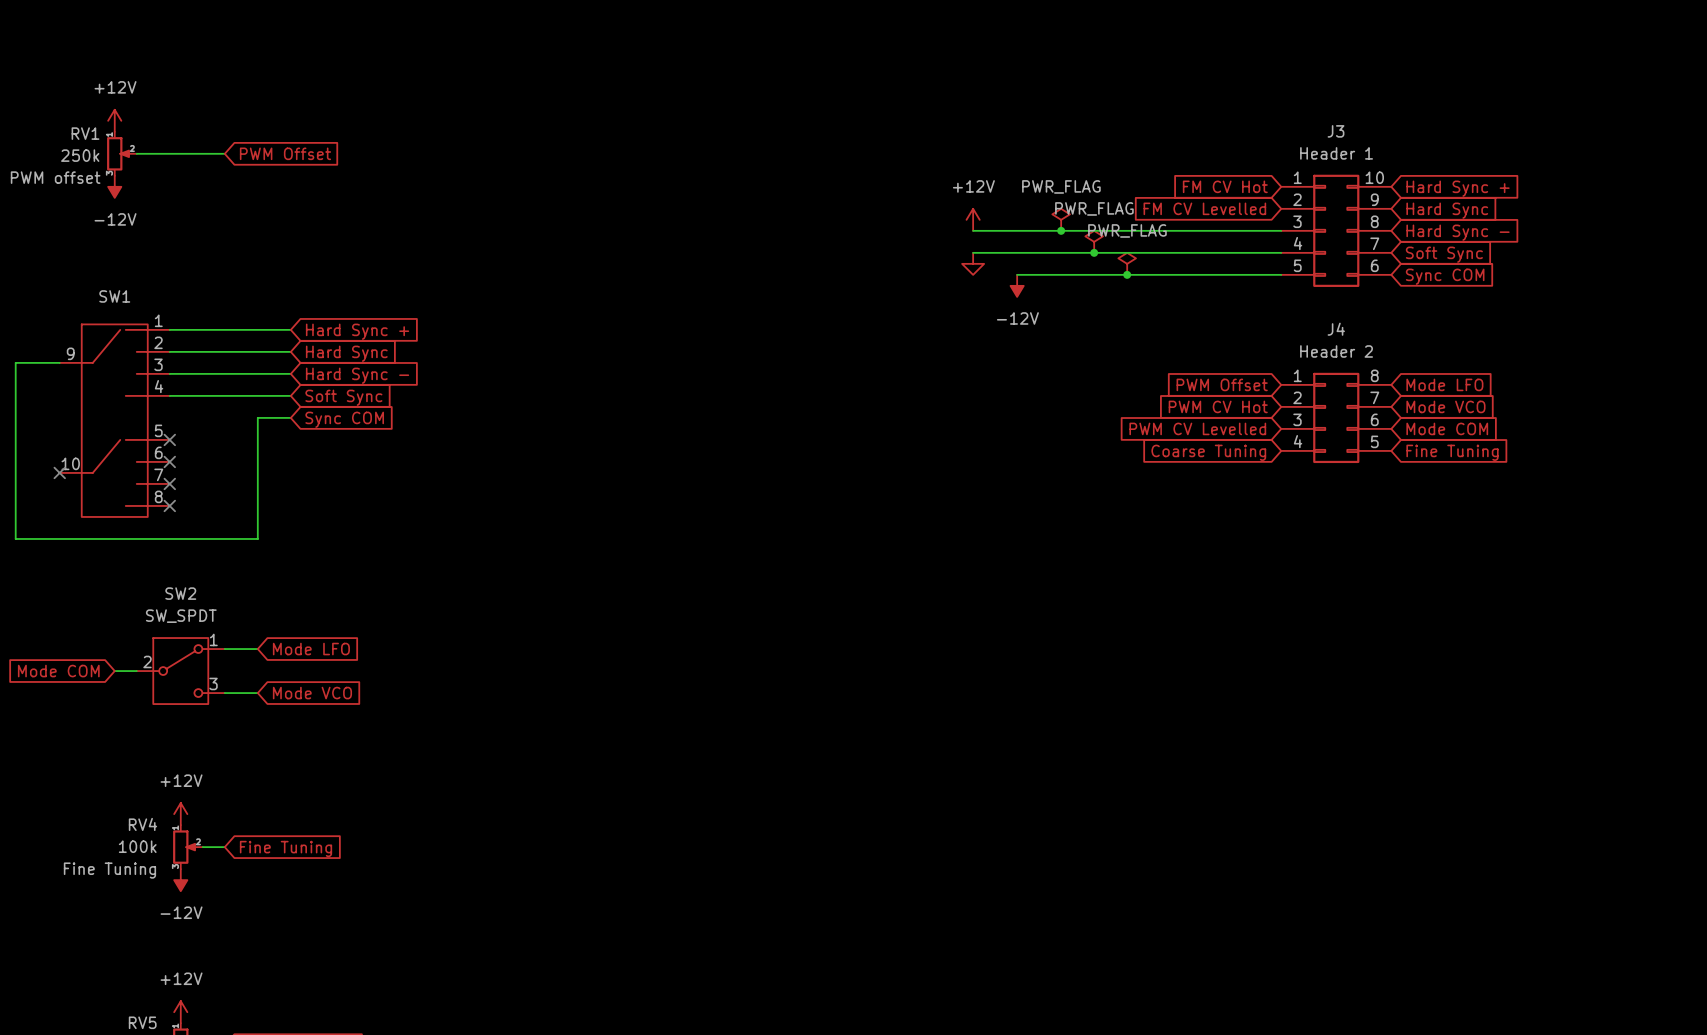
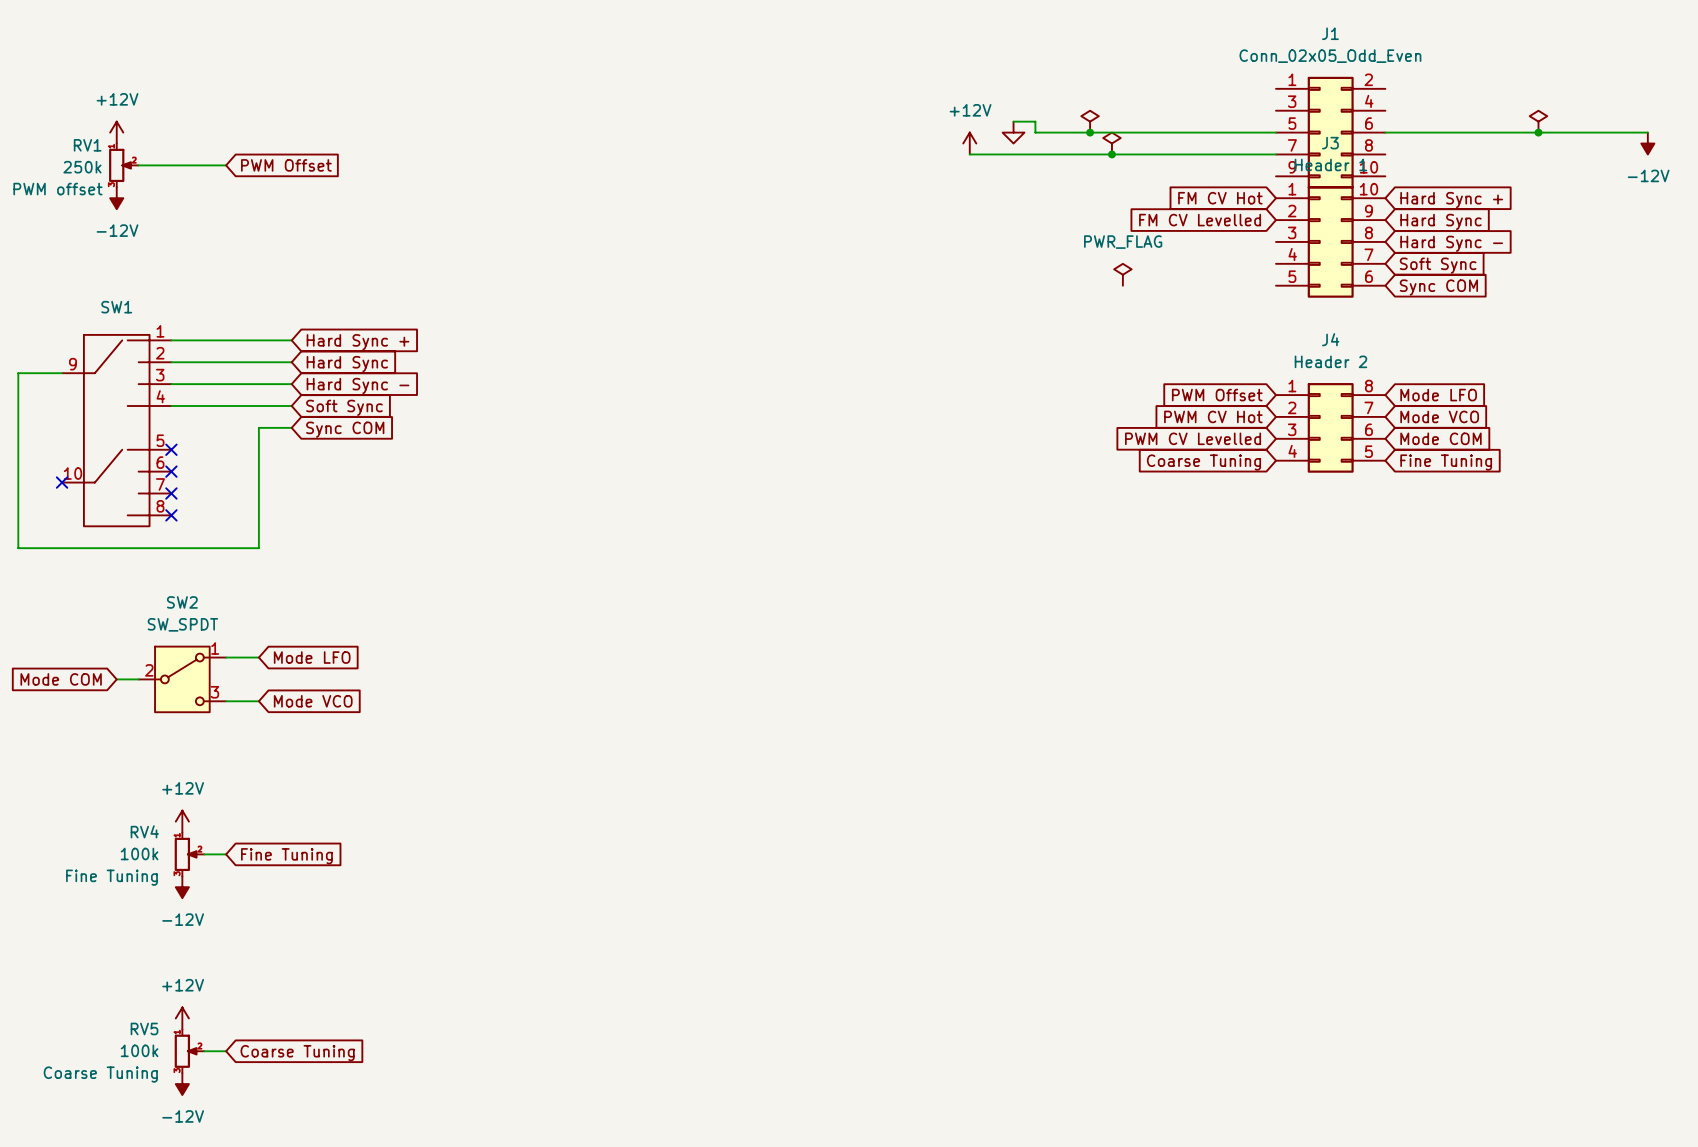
wire: none -> (1013, 121) (1035, 121) (1035, 132) (1276, 132)
power symbol: none -> (1090, 121)
power symbol: none -> (1538, 121)
junction: none -> (1090, 132)
J1: none -> Conn_02x05_Odd_Even (1330, 132)
wire: none -> (1385, 132) (1647, 132)
junction: none -> (1538, 132)
power symbol: none -> (1111, 143)
power symbol: none -> -12V (1647, 143)
junction: none -> (1111, 154)
power symbol position: +12V (973, 219) -> +12V (969, 143)
power symbol: PWR_FLAG (1061, 219) -> none
wire: (973, 230) (1281, 230) -> (969, 154) (1276, 154)
junction: (1061, 230) -> none
power symbol: PWR_FLAG (1094, 241) -> none
wire: (973, 252) (1281, 252) -> none
junction: (1094, 252) -> none
power symbol position: (973, 263) -> (1013, 132)
wire: (1017, 274) (1281, 274) -> none
junction: (1127, 274) -> none
power symbol: -12V (1017, 285) -> none

